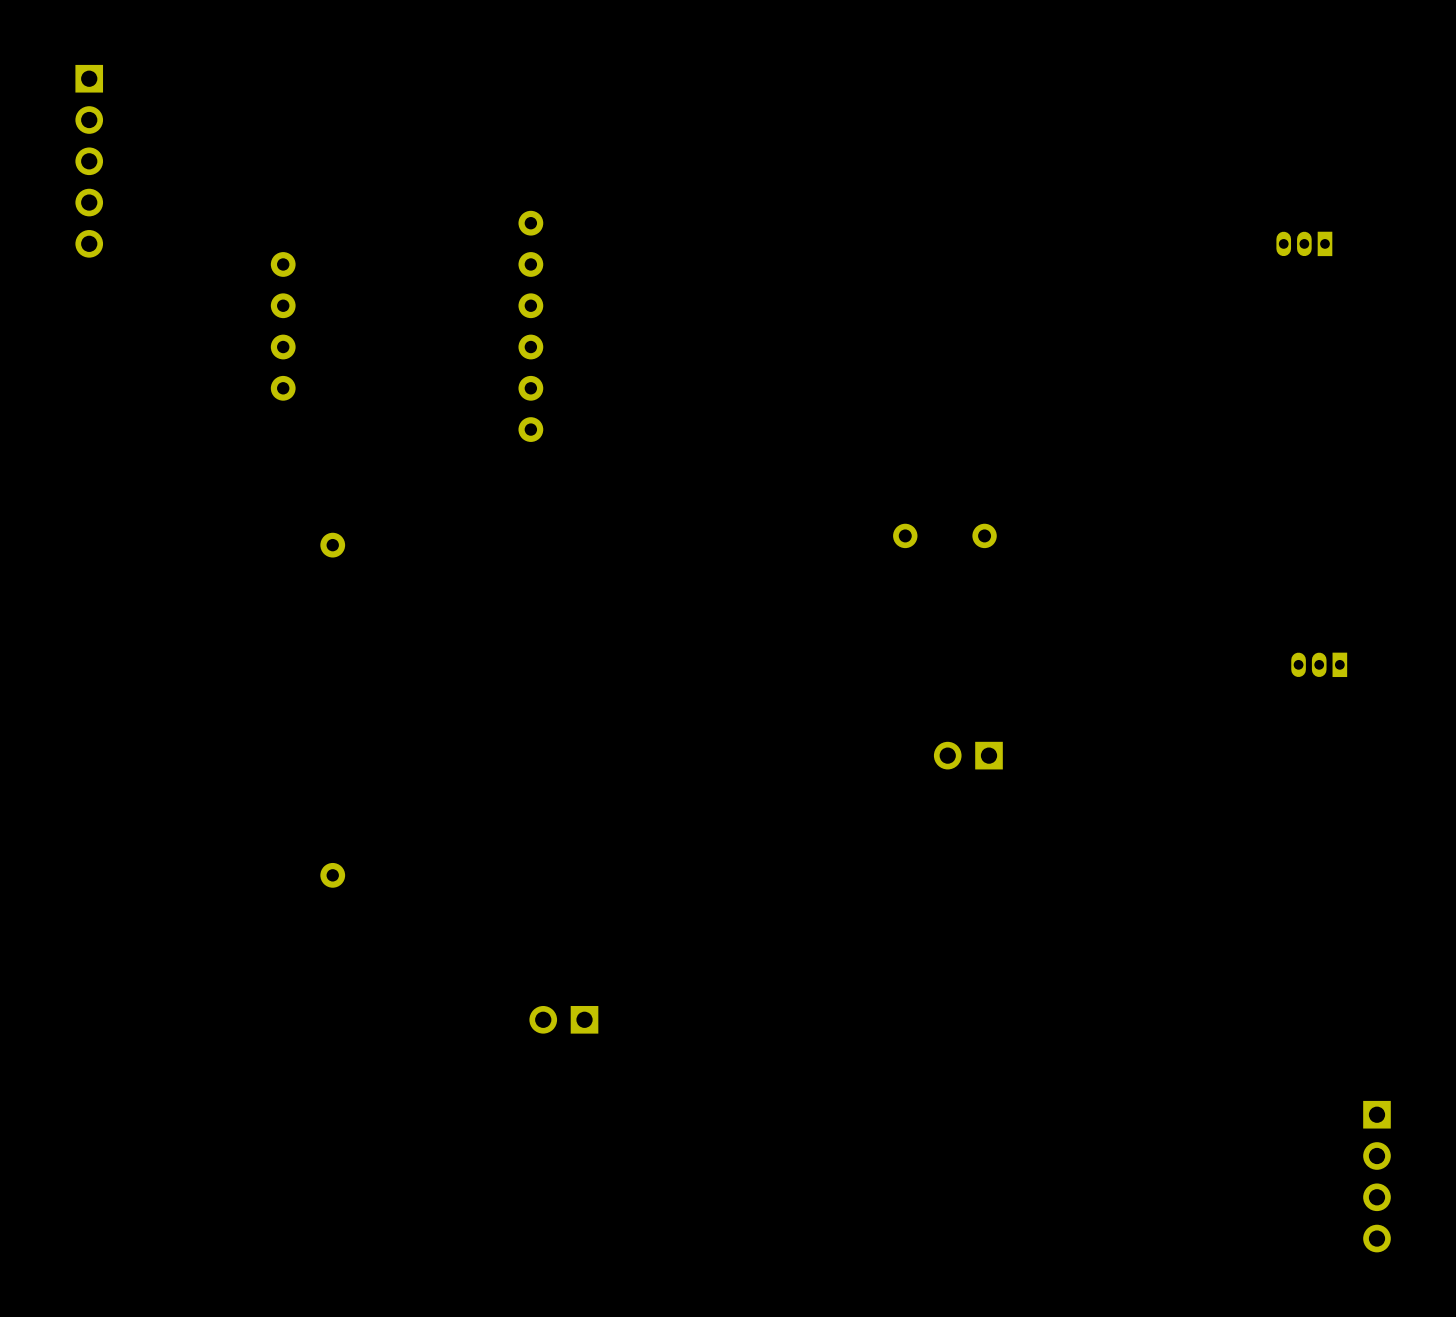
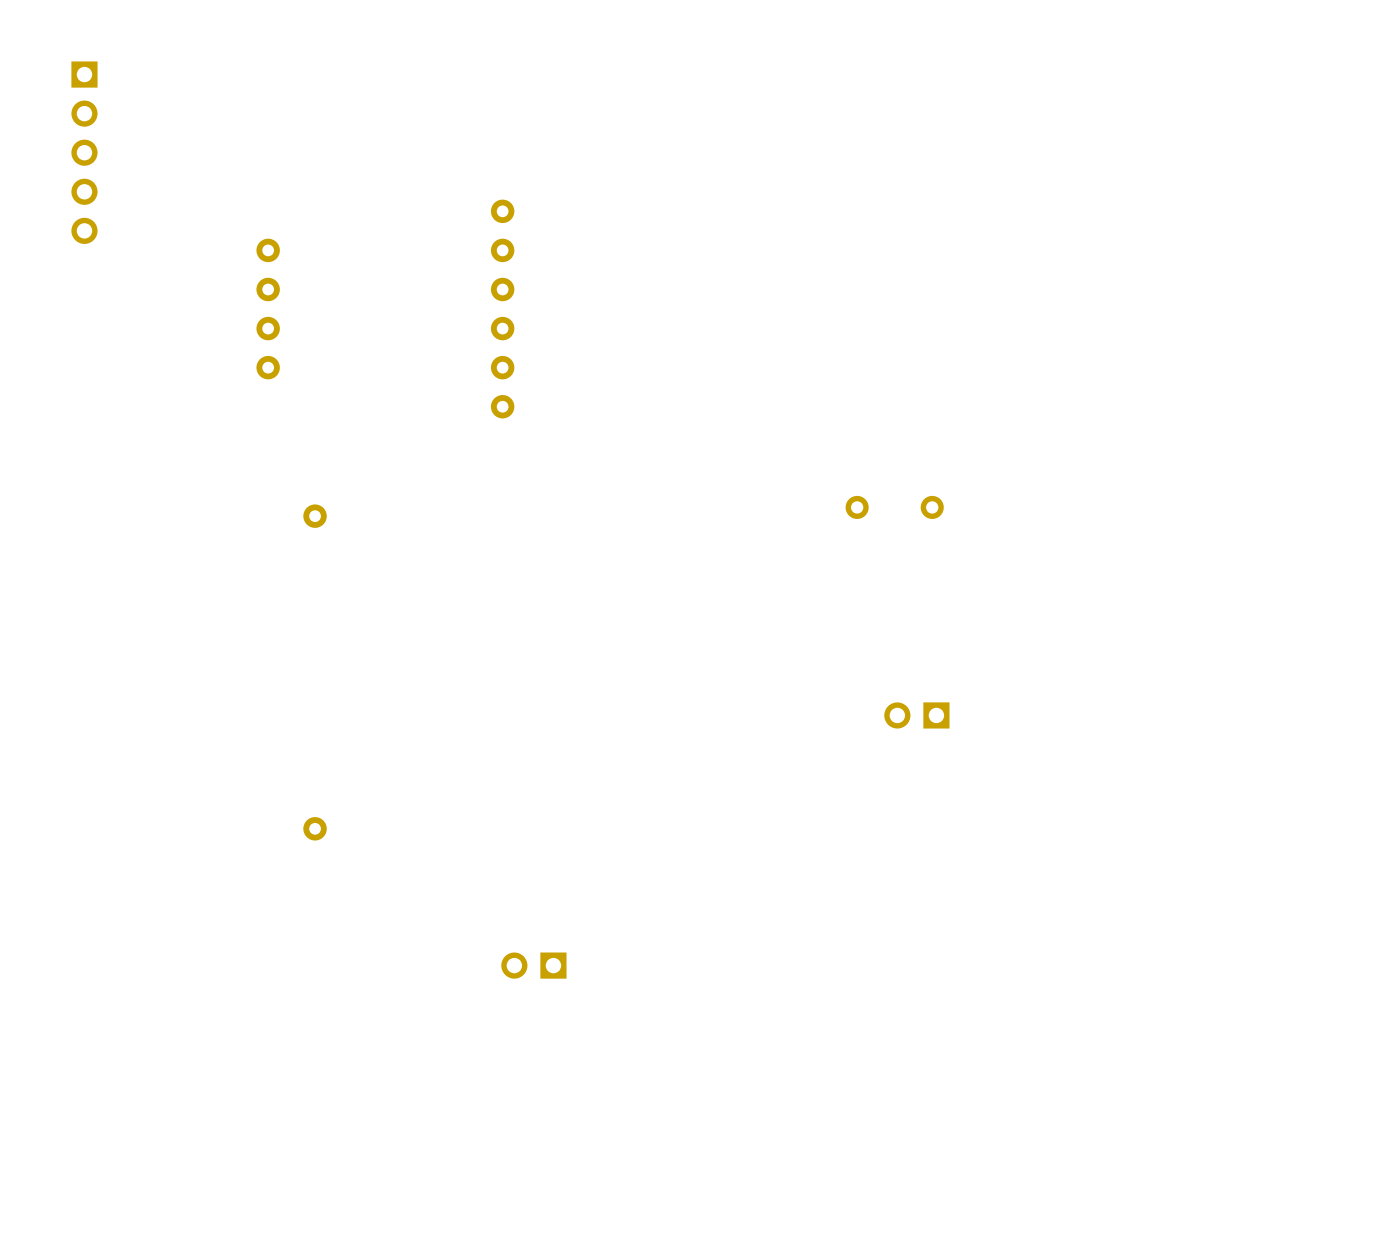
part: (1304, 243) -> none
part: (1319, 664) -> none
part: (1376, 1176) -> none

